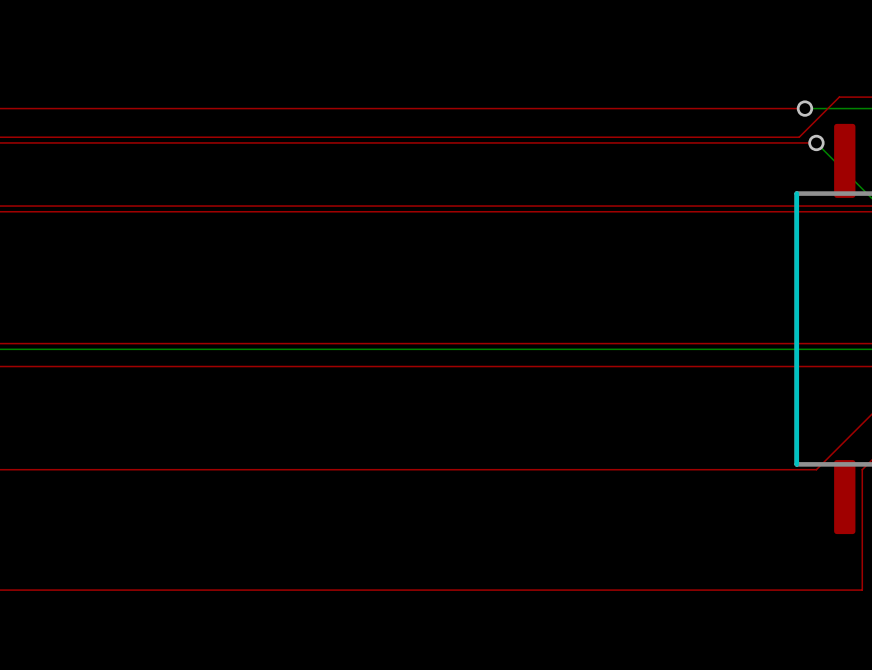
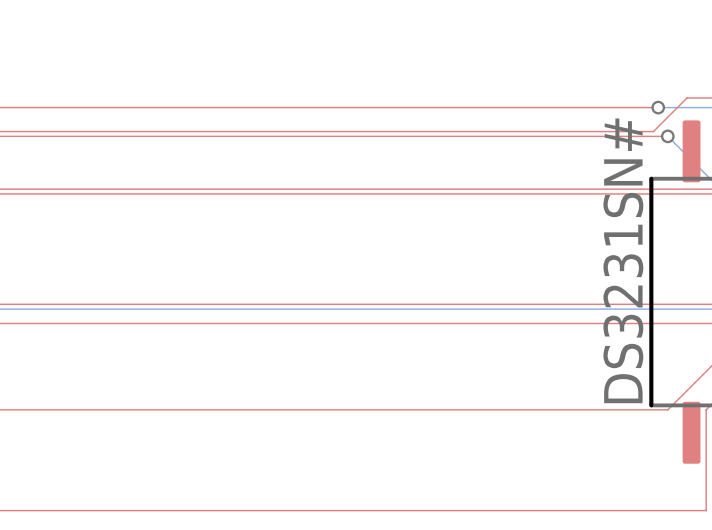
part value: none -> DS3231SN# (623, 260)

